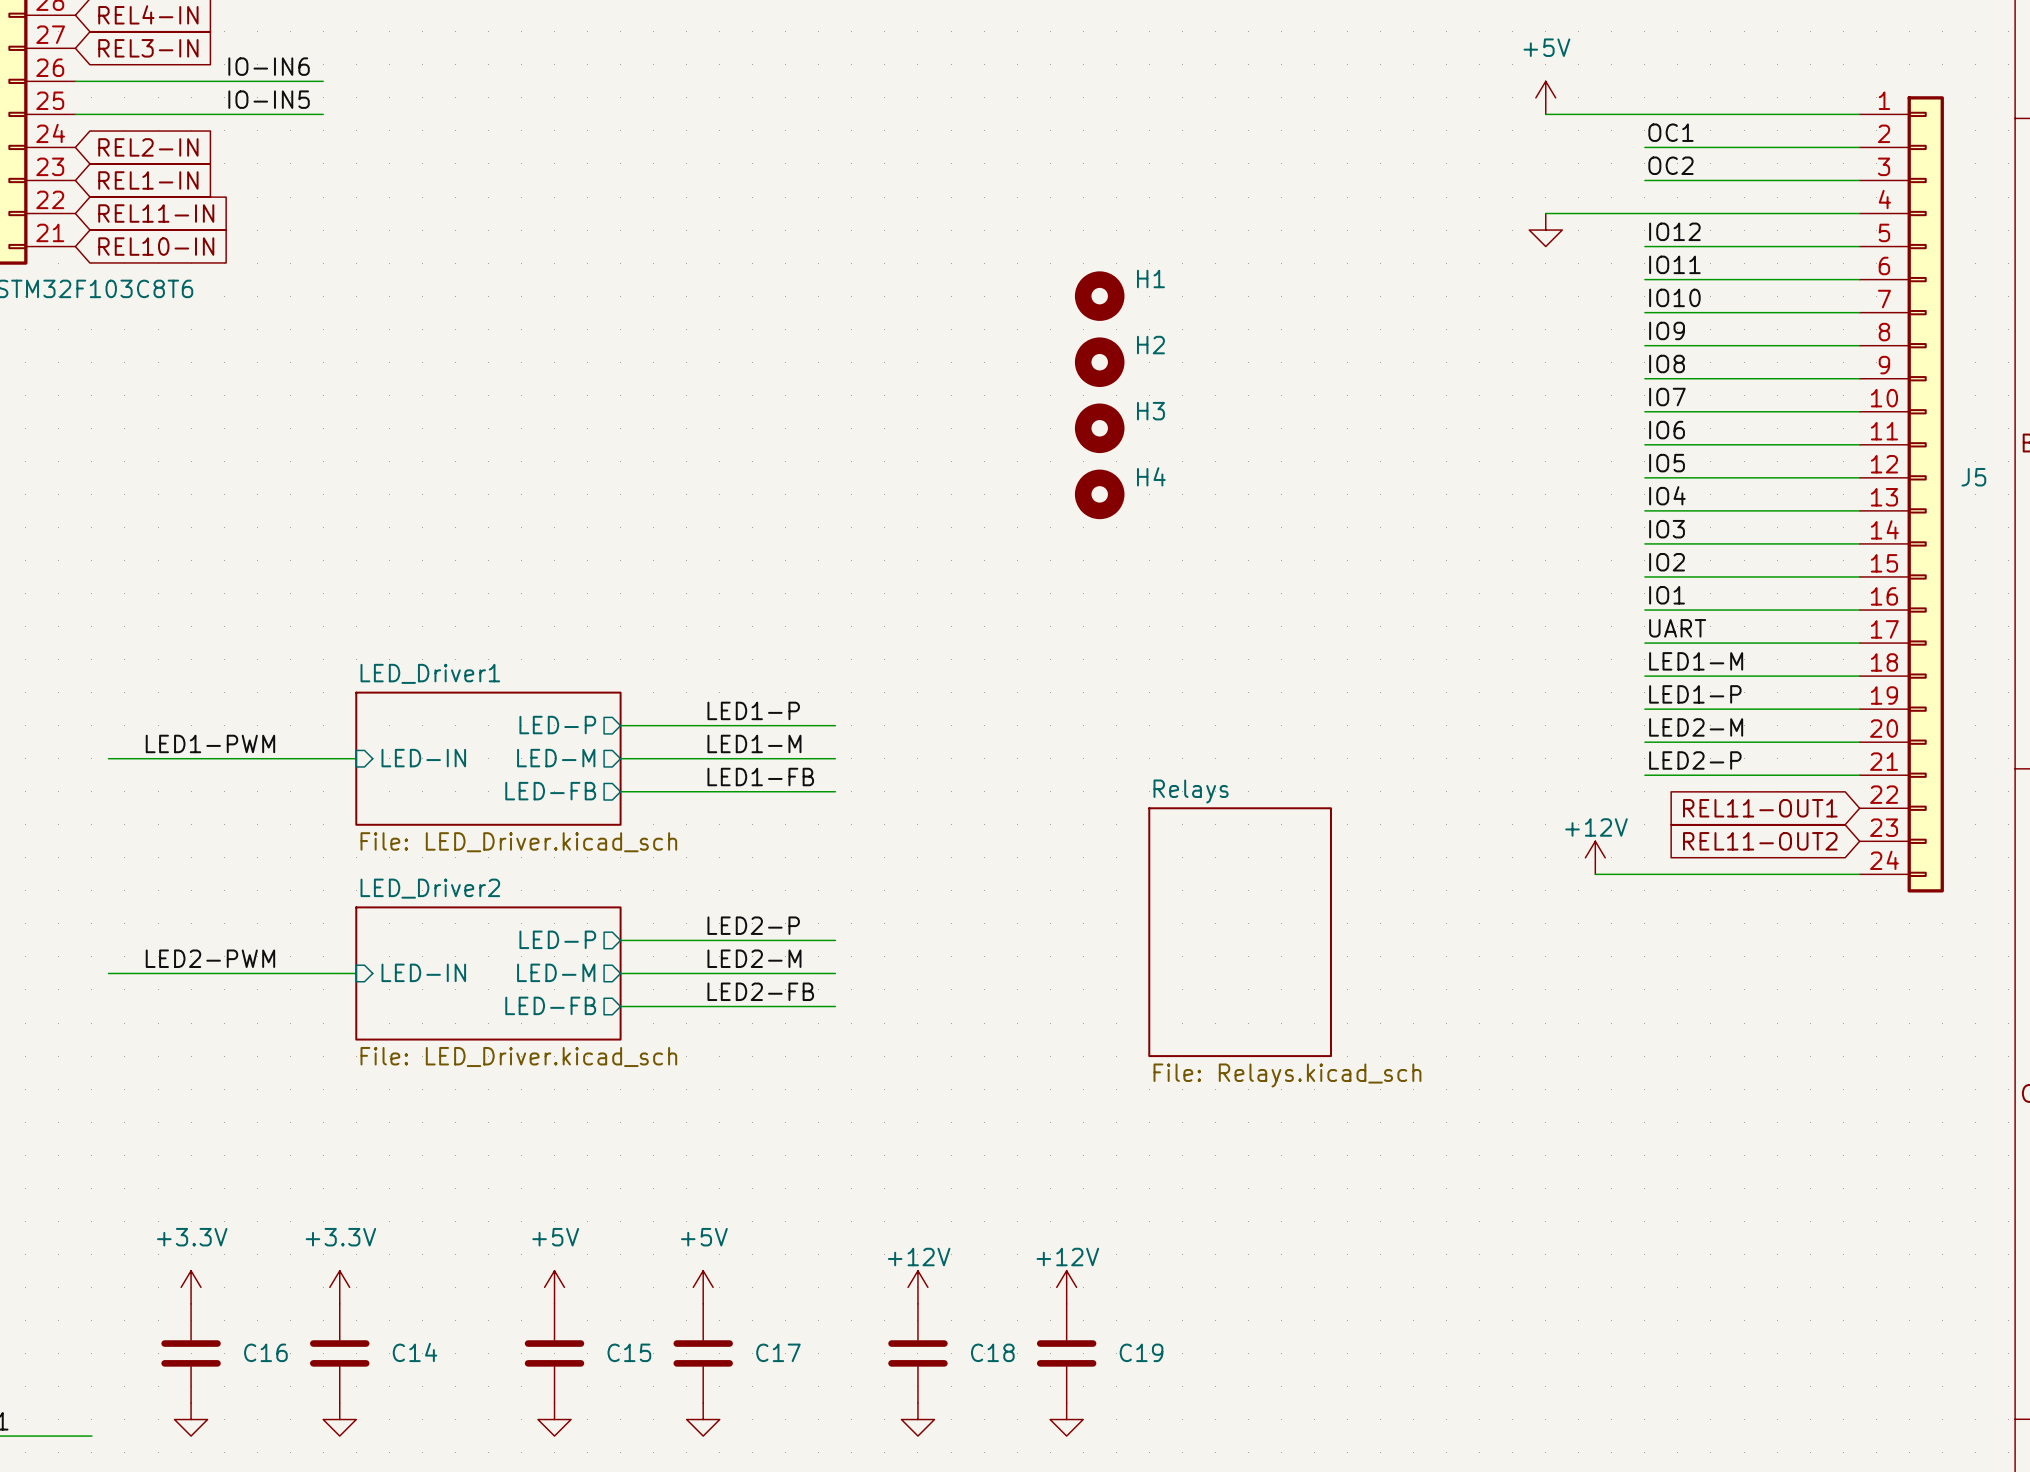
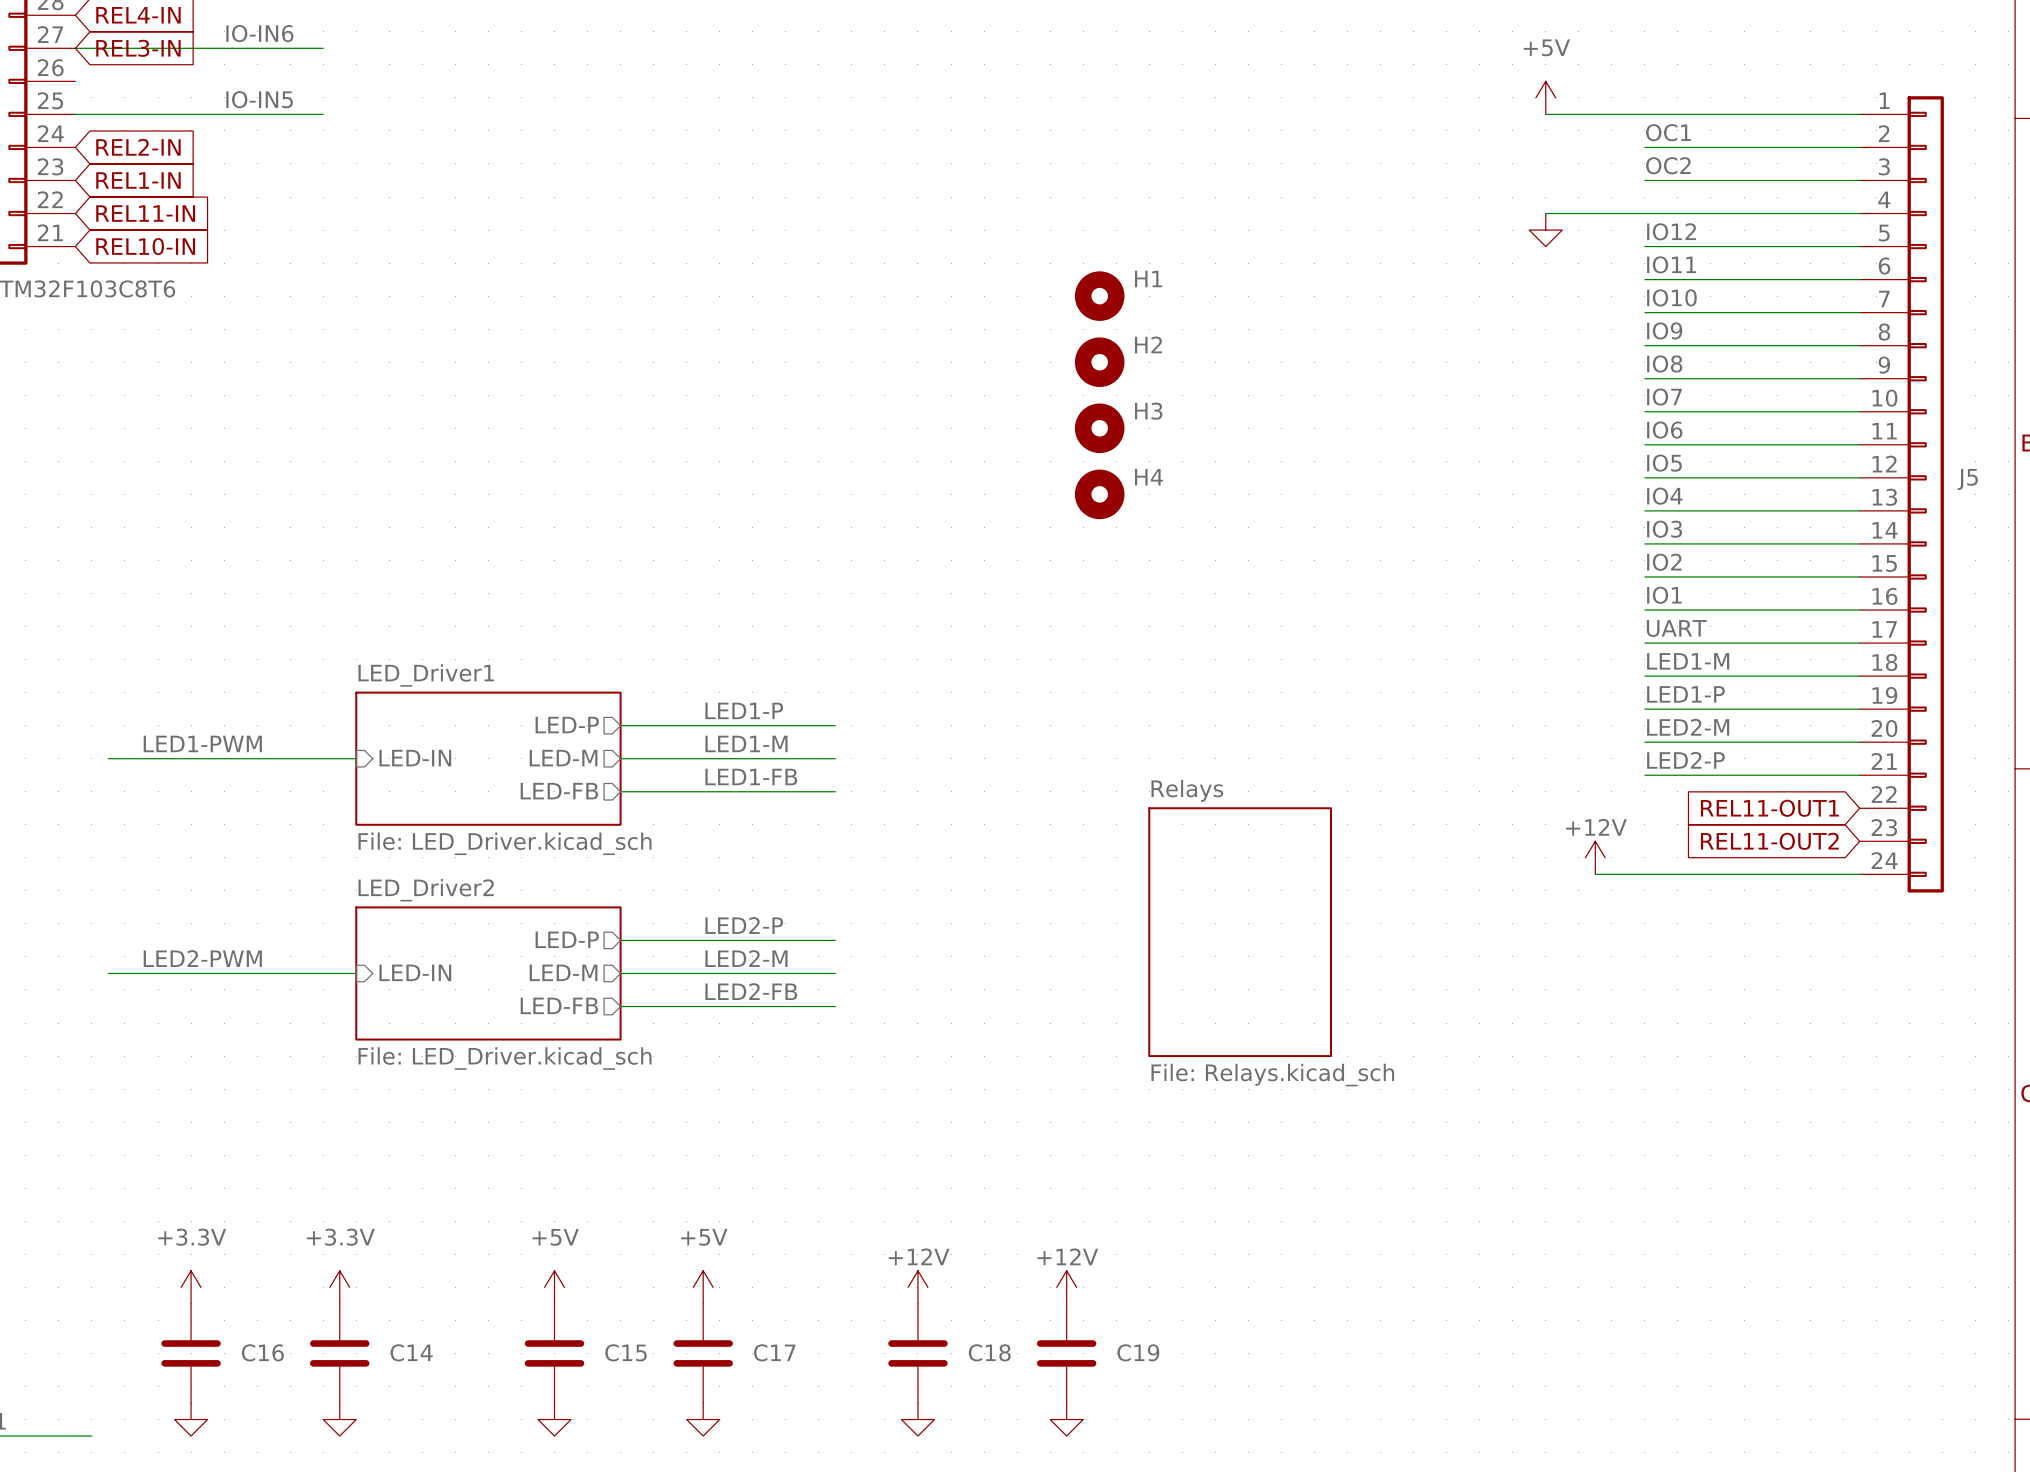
label position: IO-IN6 (269, 66) -> IO-IN6 (259, 33)
wire: (75, 81) (323, 81) -> (75, 48) (323, 48)

